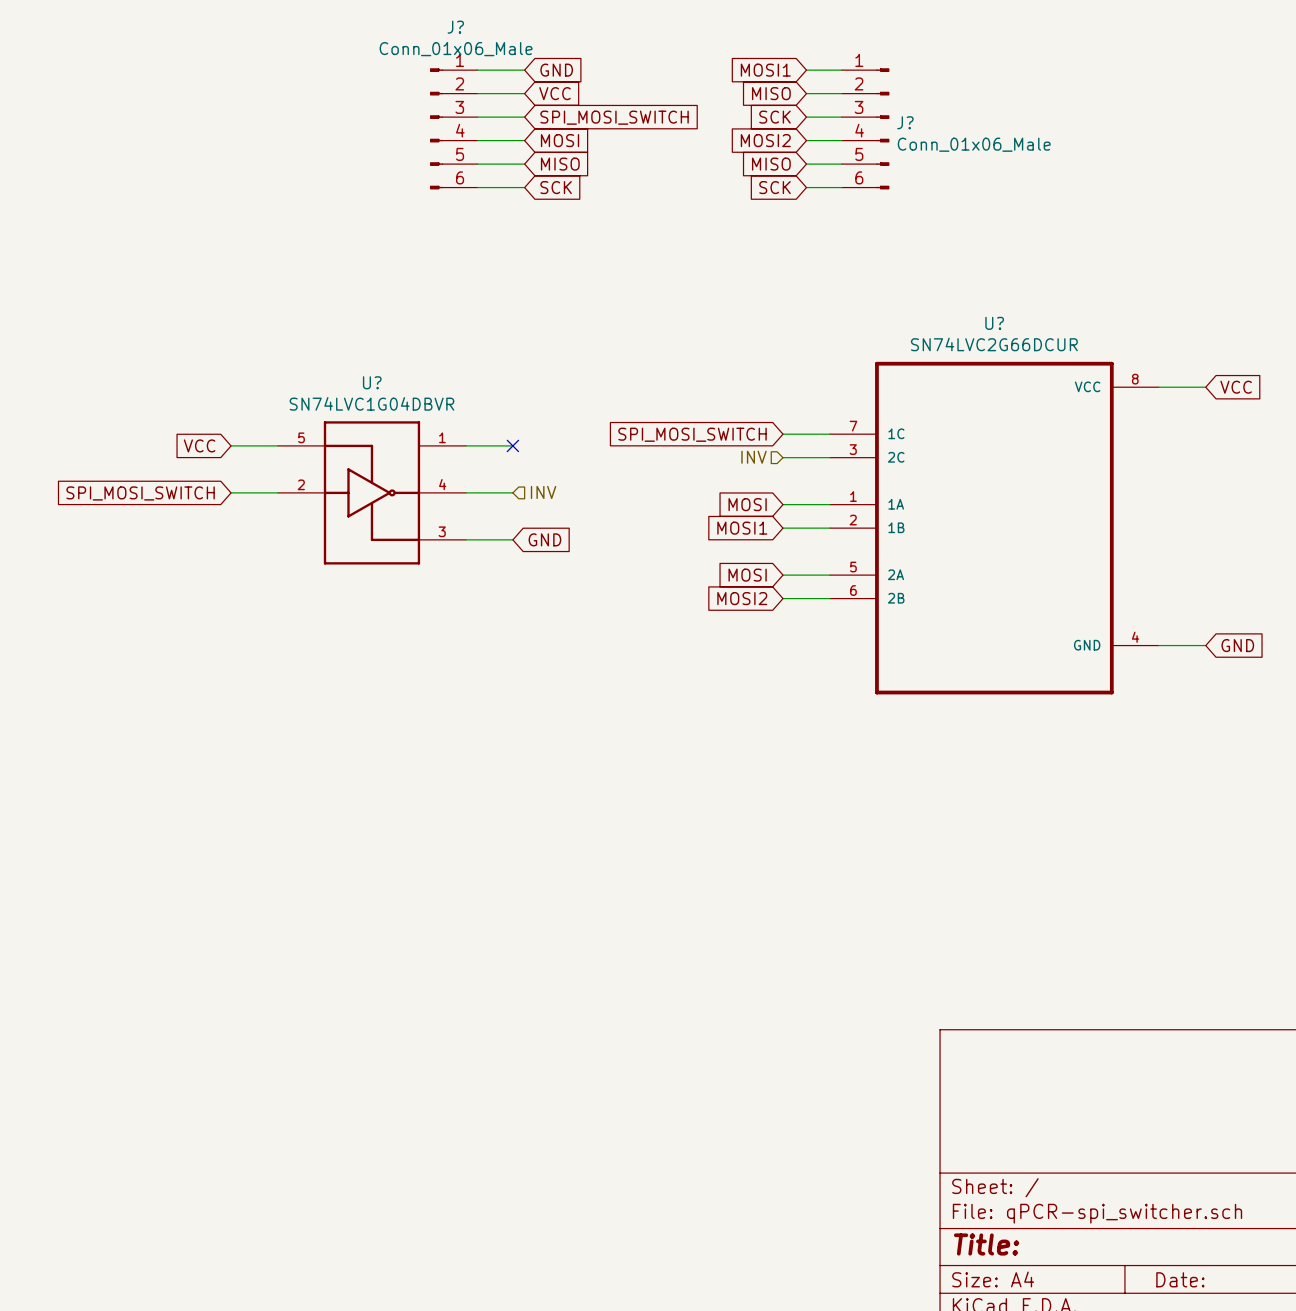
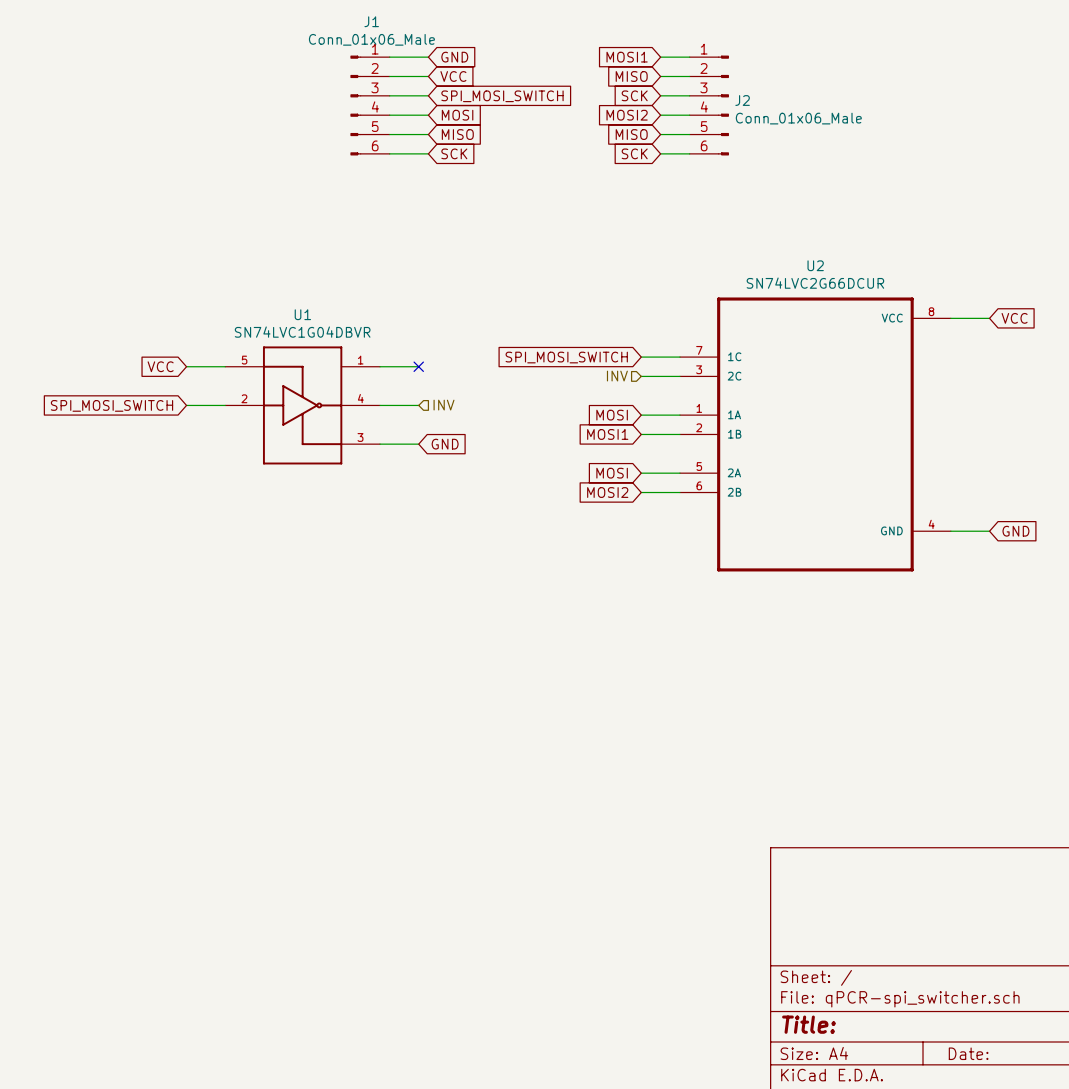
J? name: J? (455, 27) -> J1 (371, 21)
J? name: J? (905, 122) -> J2 (742, 100)
U? name: U? (994, 323) -> U2 (815, 265)
U? name: U? (372, 382) -> U1 (302, 314)

